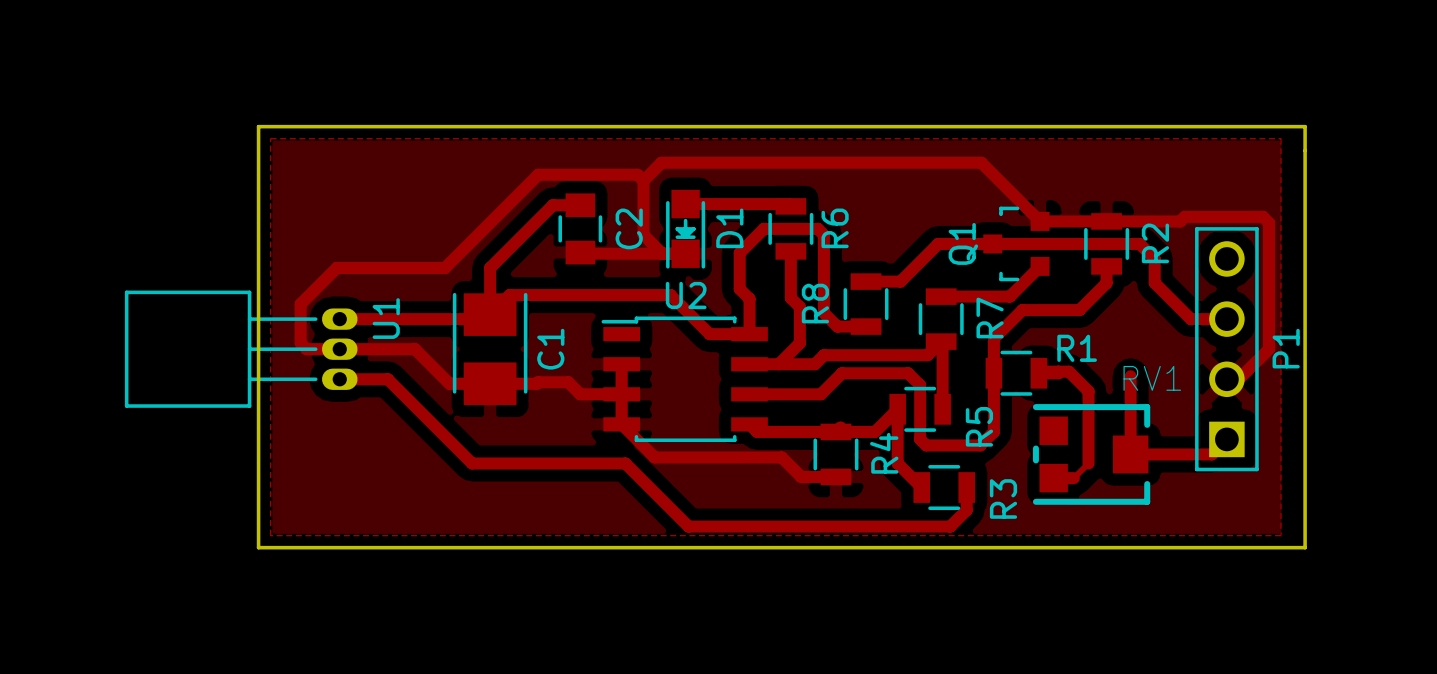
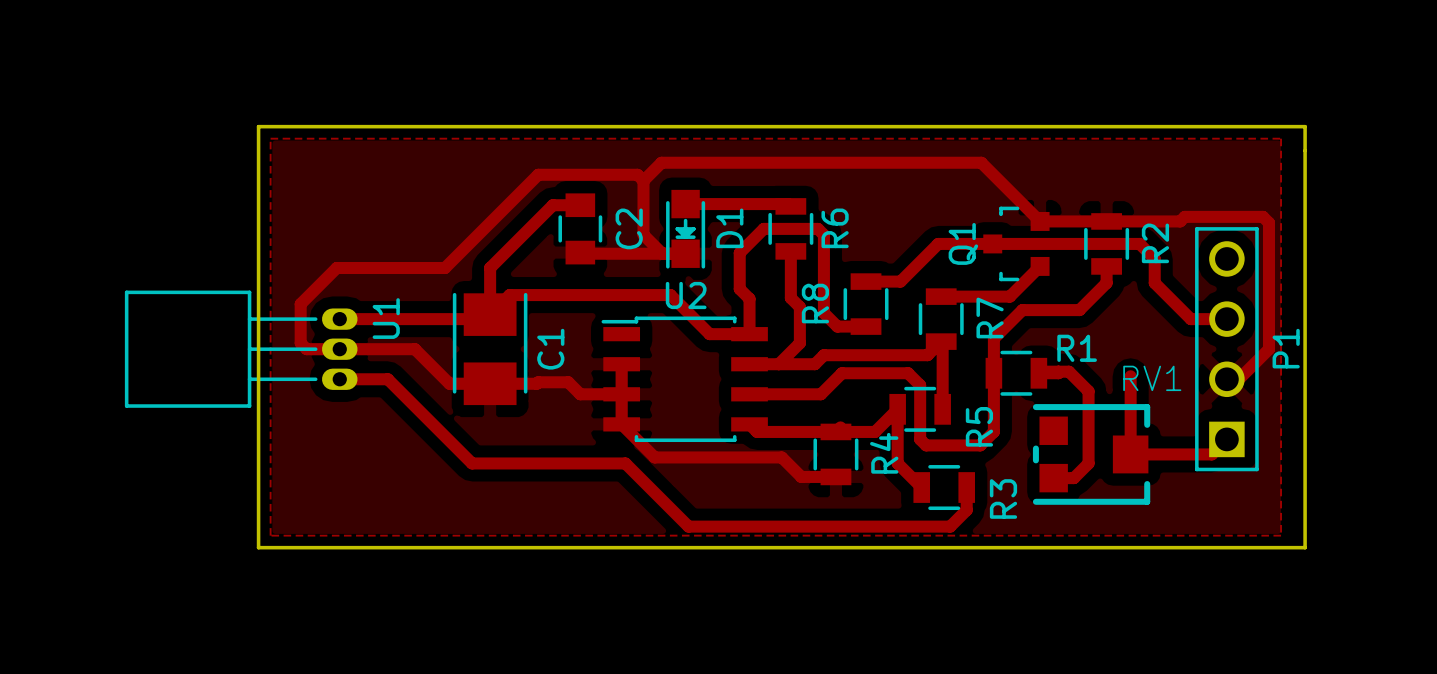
track width: thin (1088, 463) (1073, 478) -> thick (1088, 463) (1073, 478)

